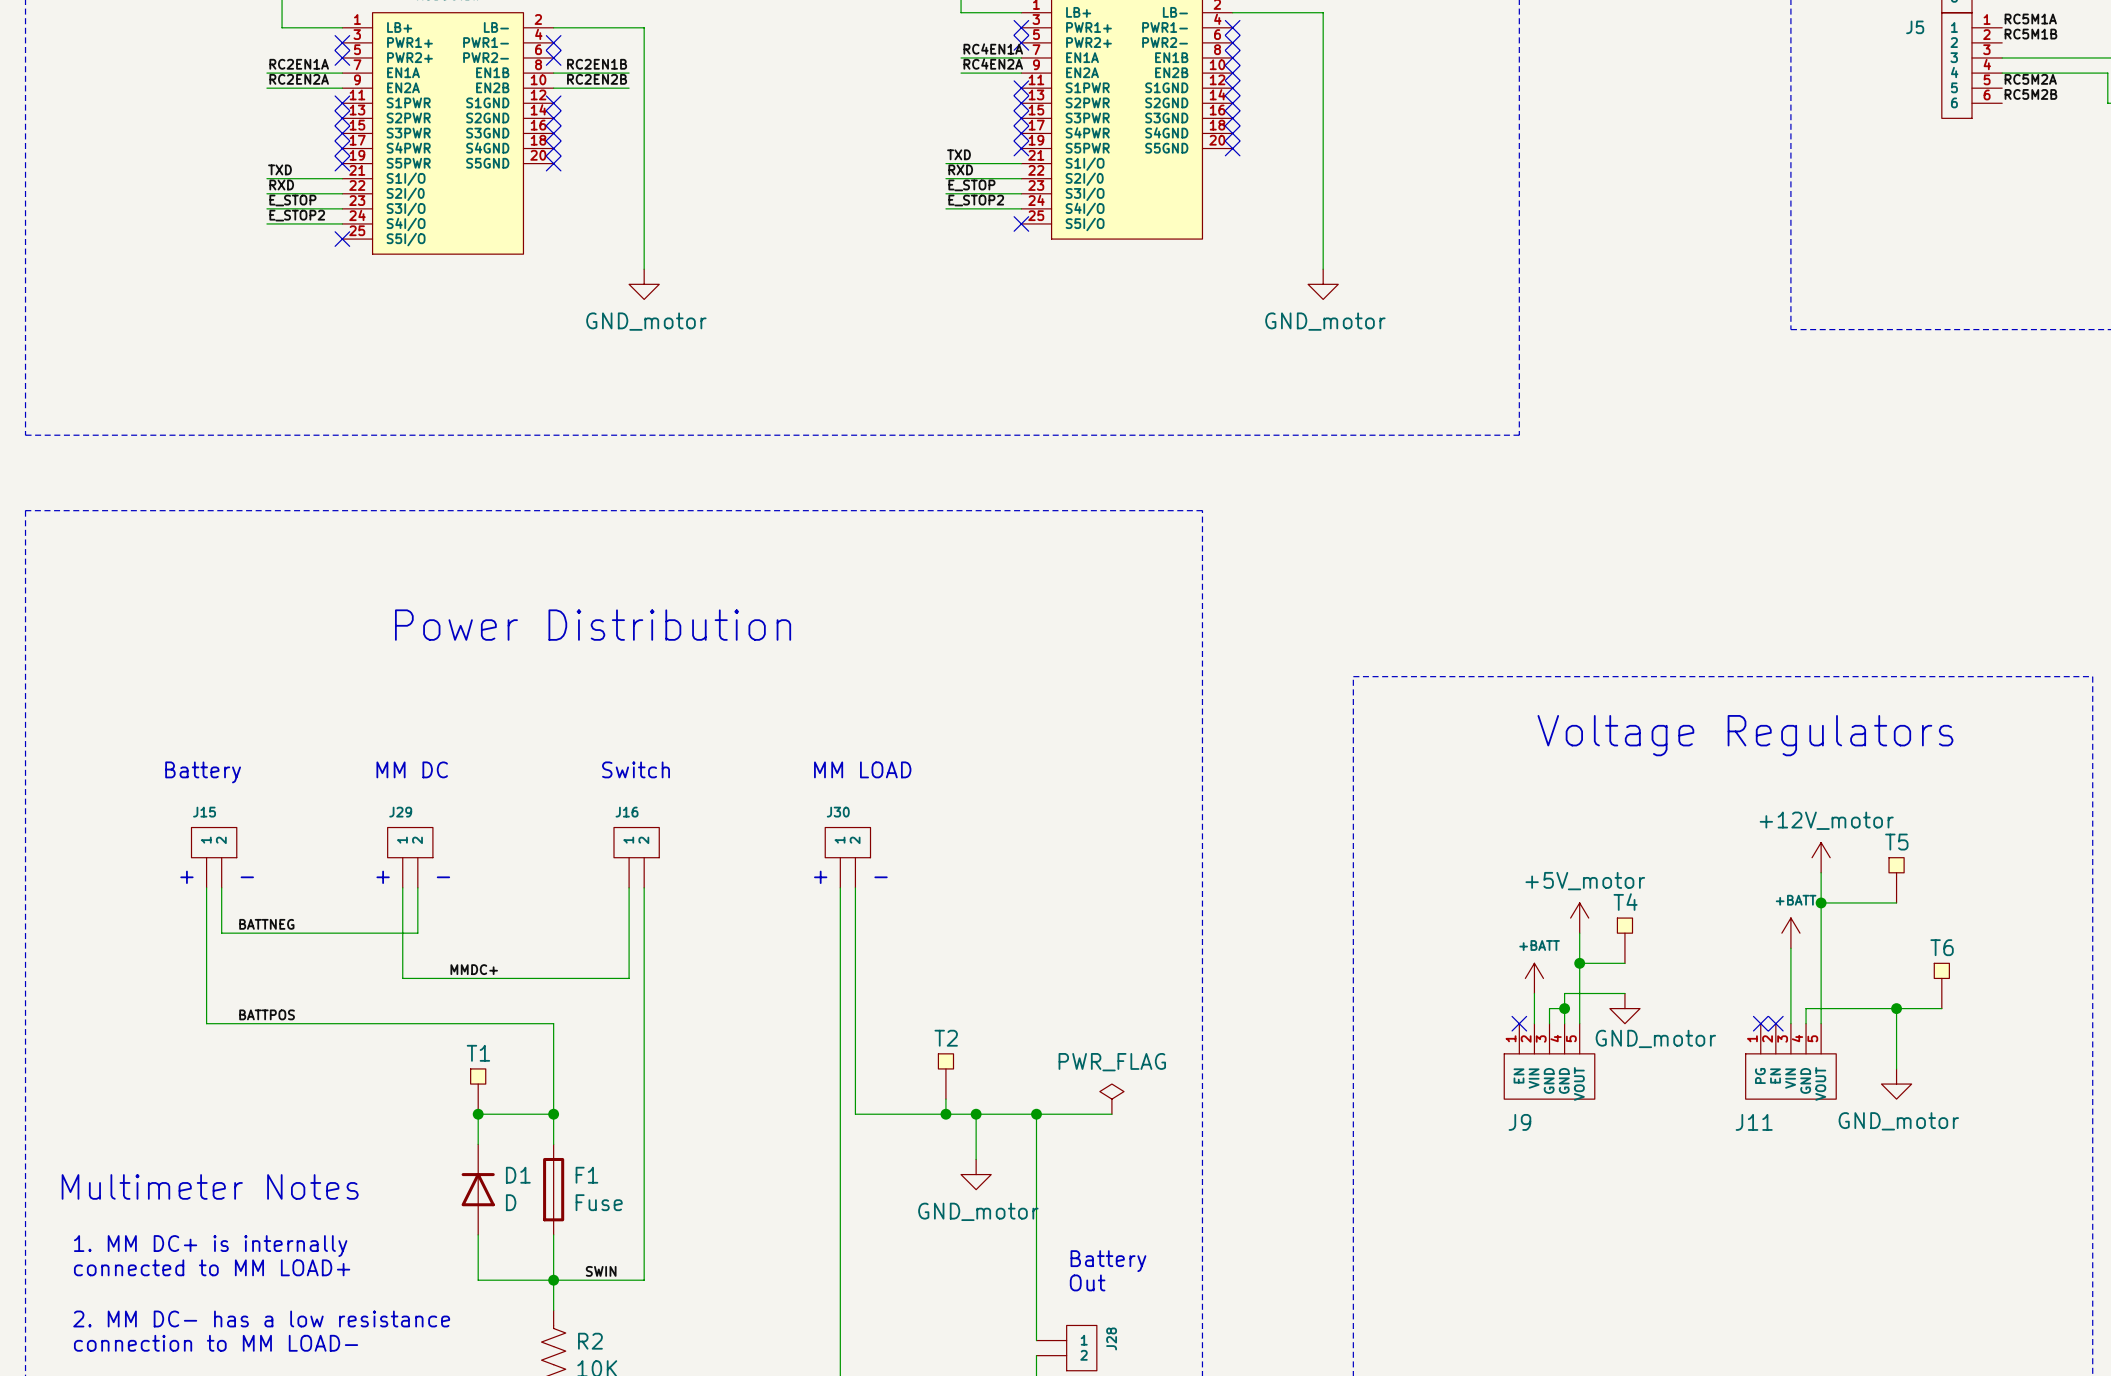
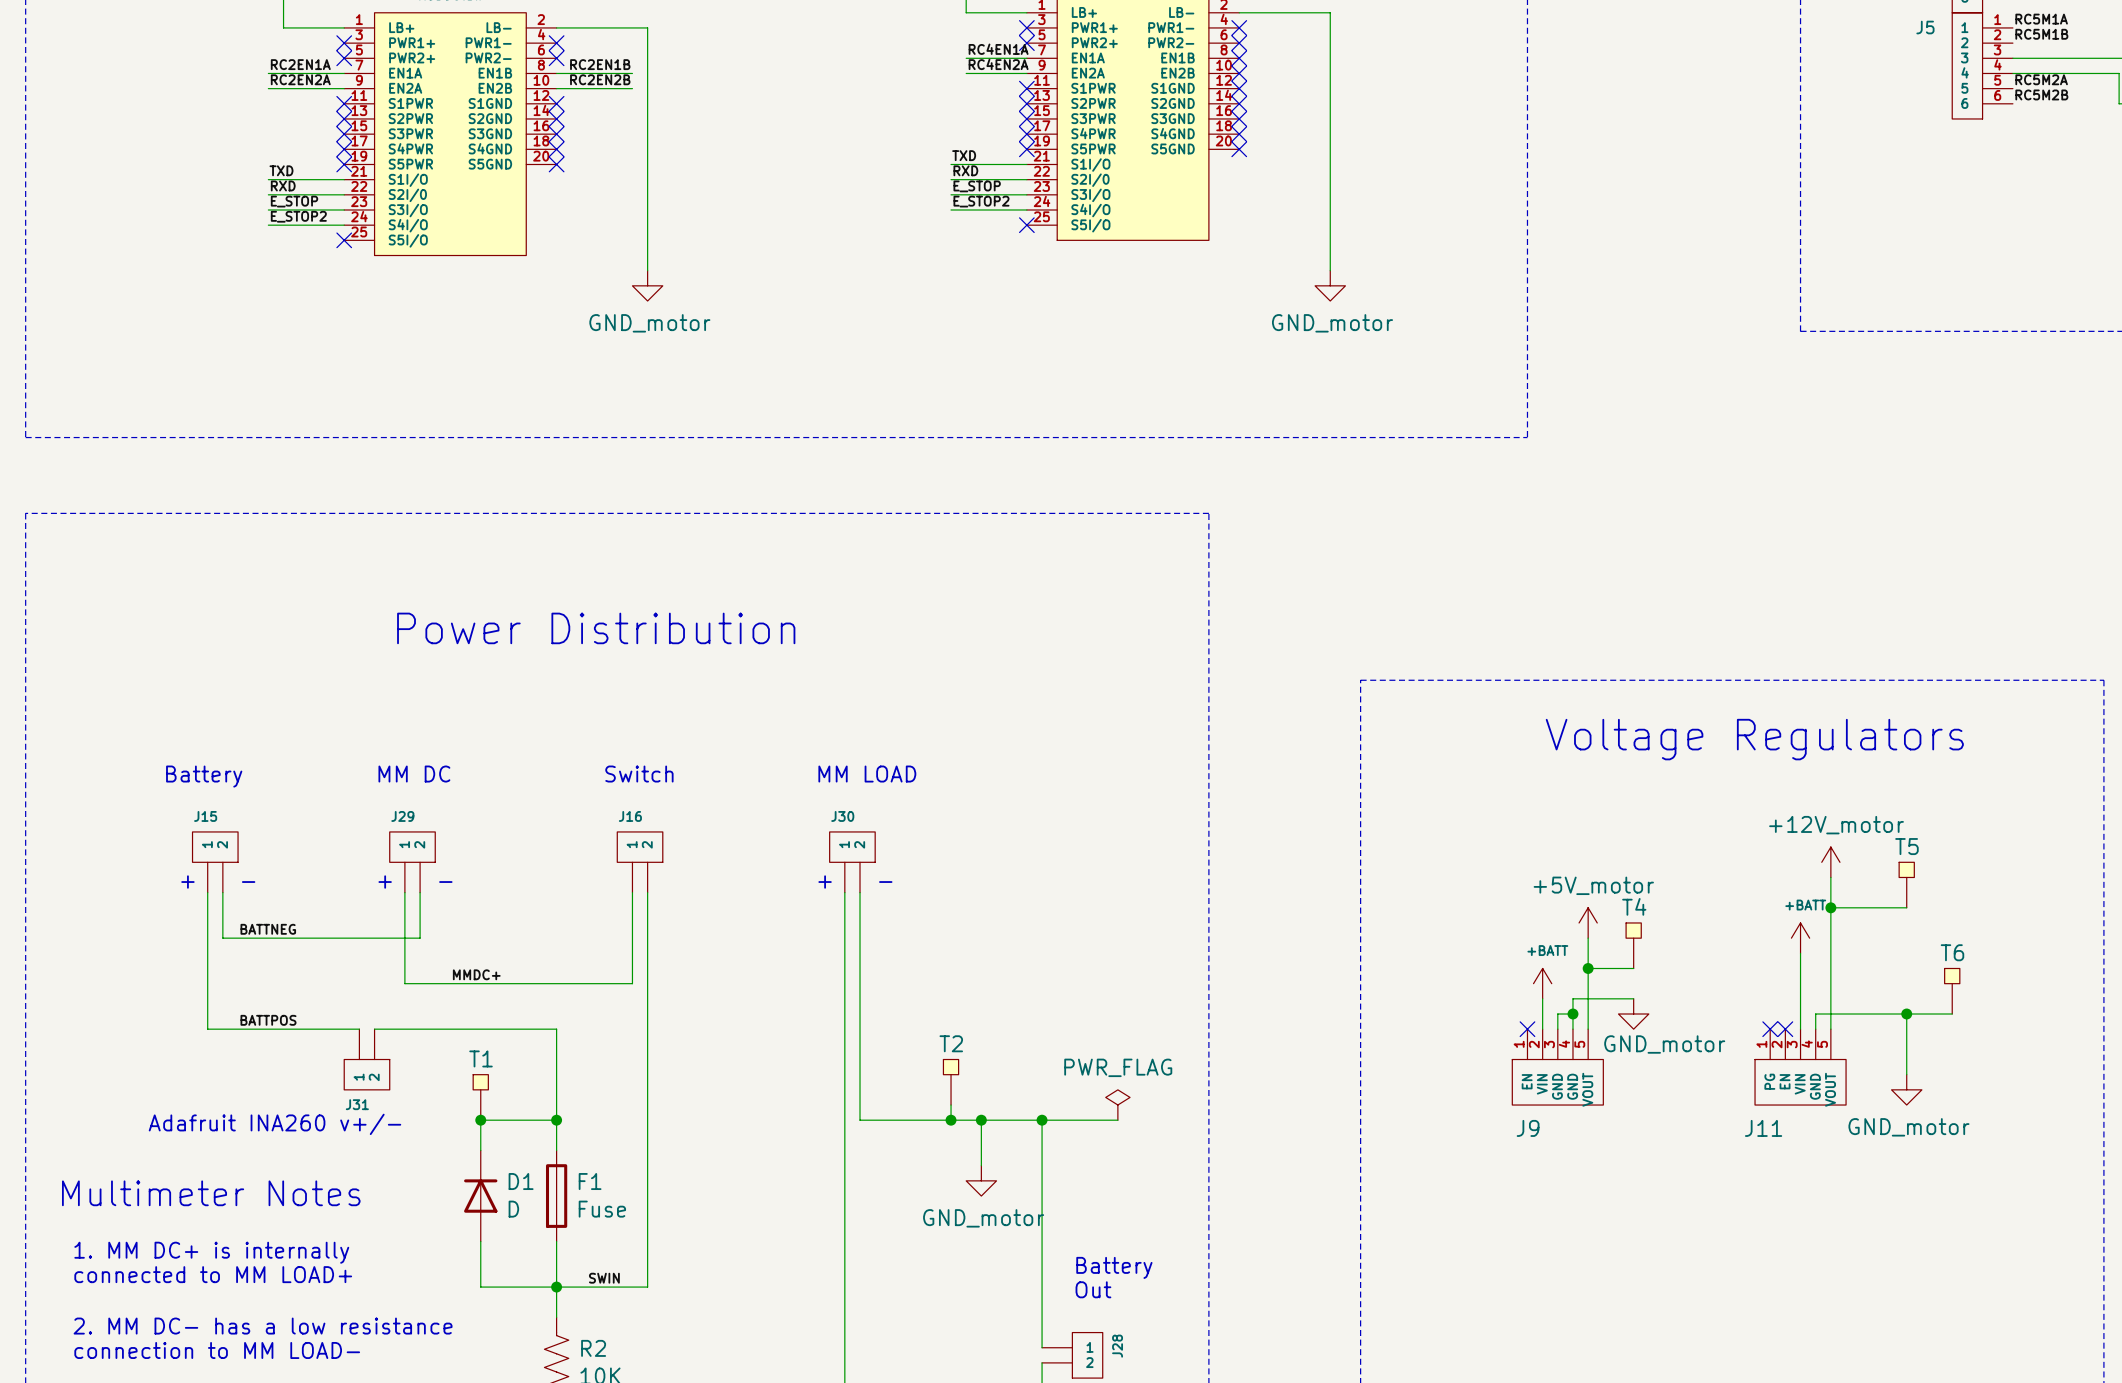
wire: (357, 1023) (372, 1023) -> none
J31: none -> (366, 1059)
text: none -> Adafruit INA260 v+/- (274, 1124)

